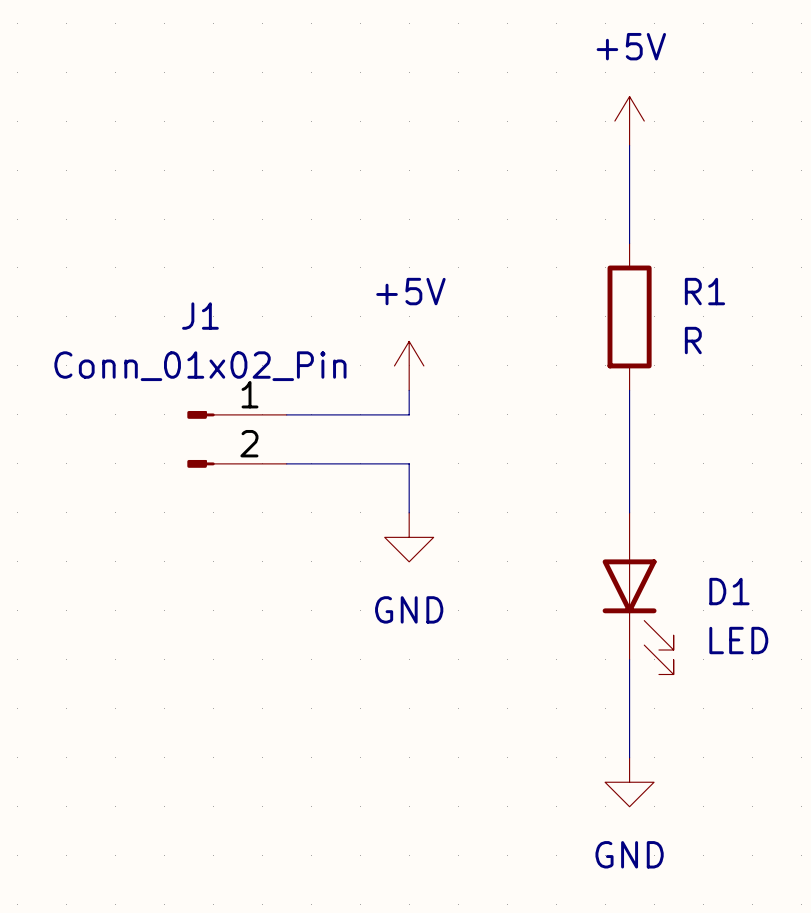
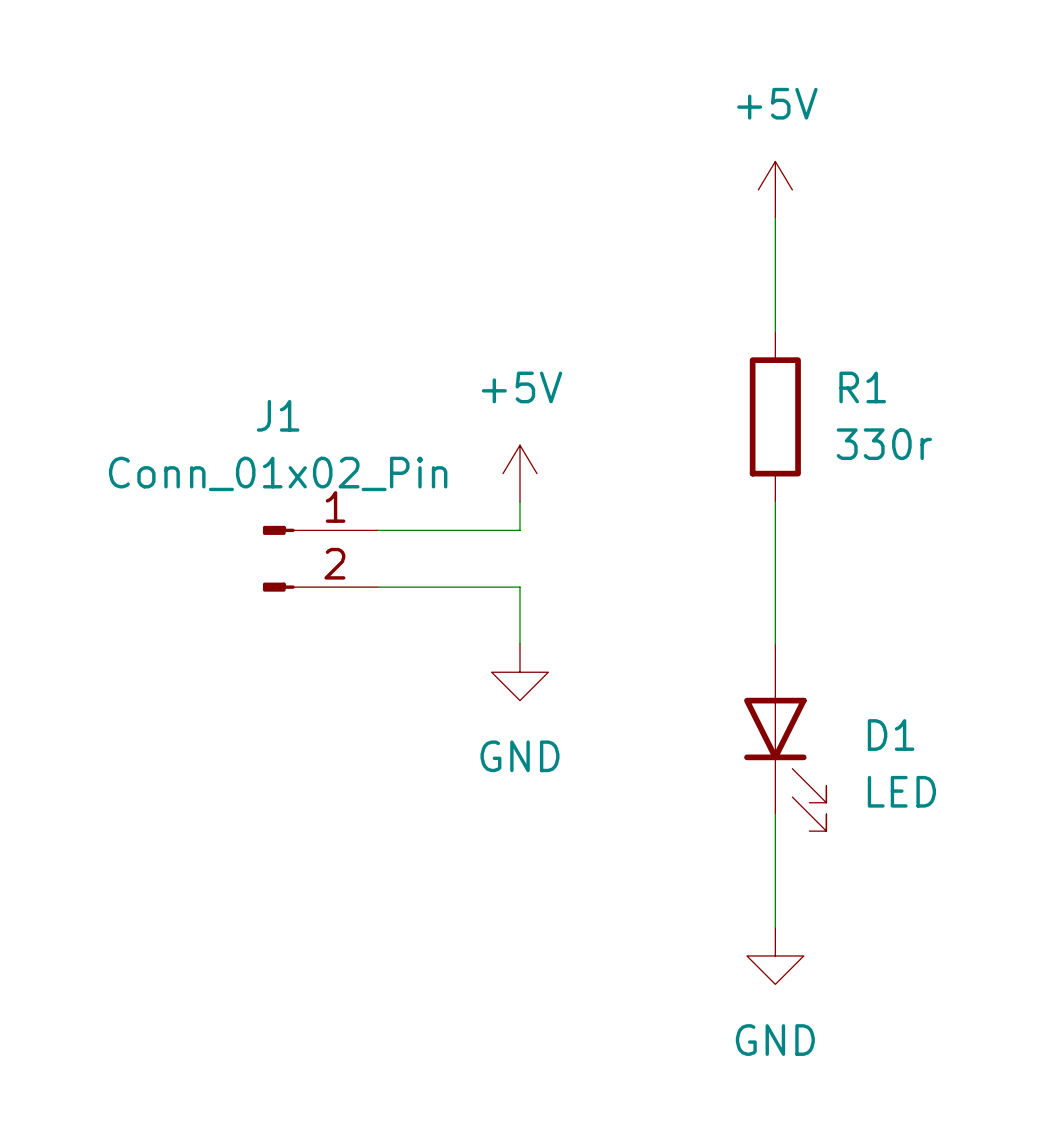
R1 value: R (693, 340) -> 330r (884, 444)

